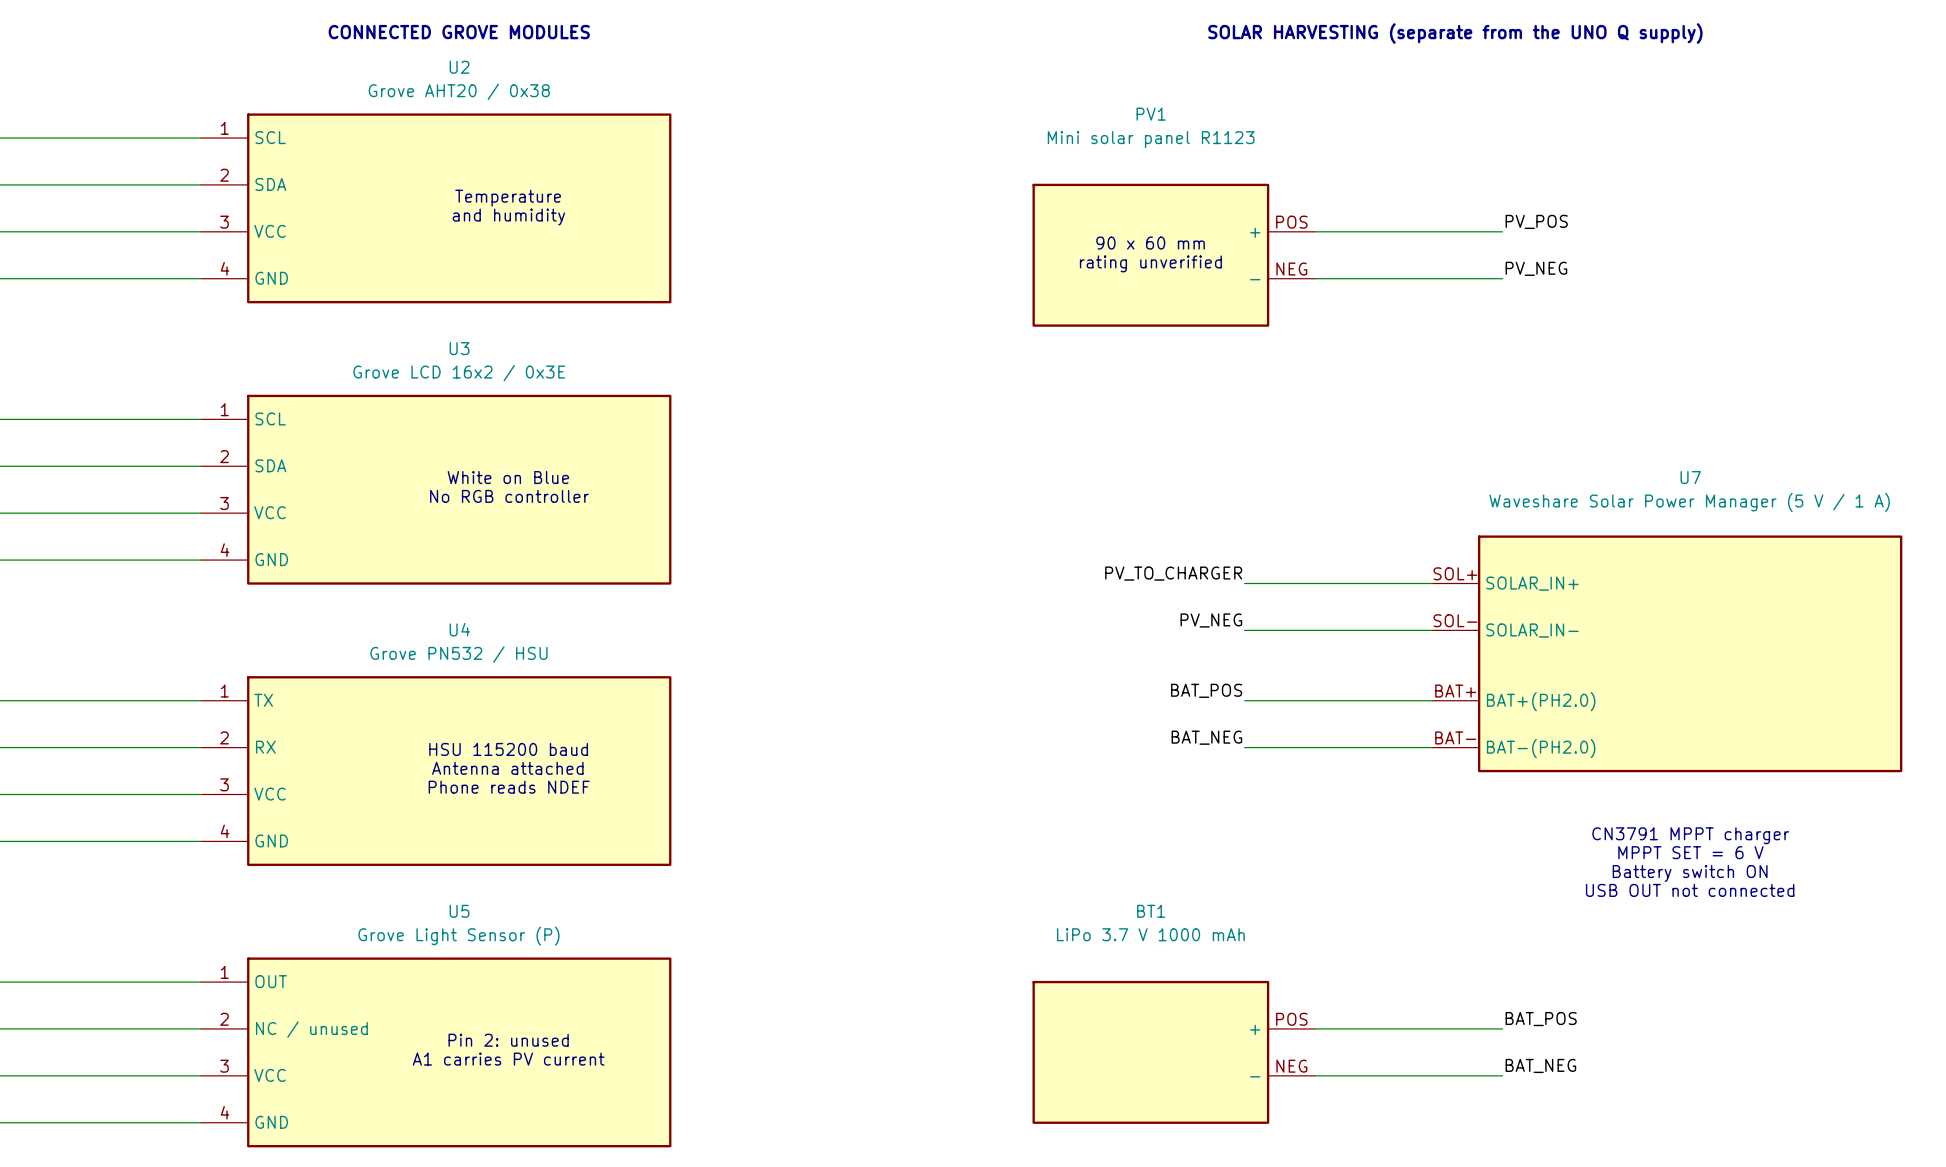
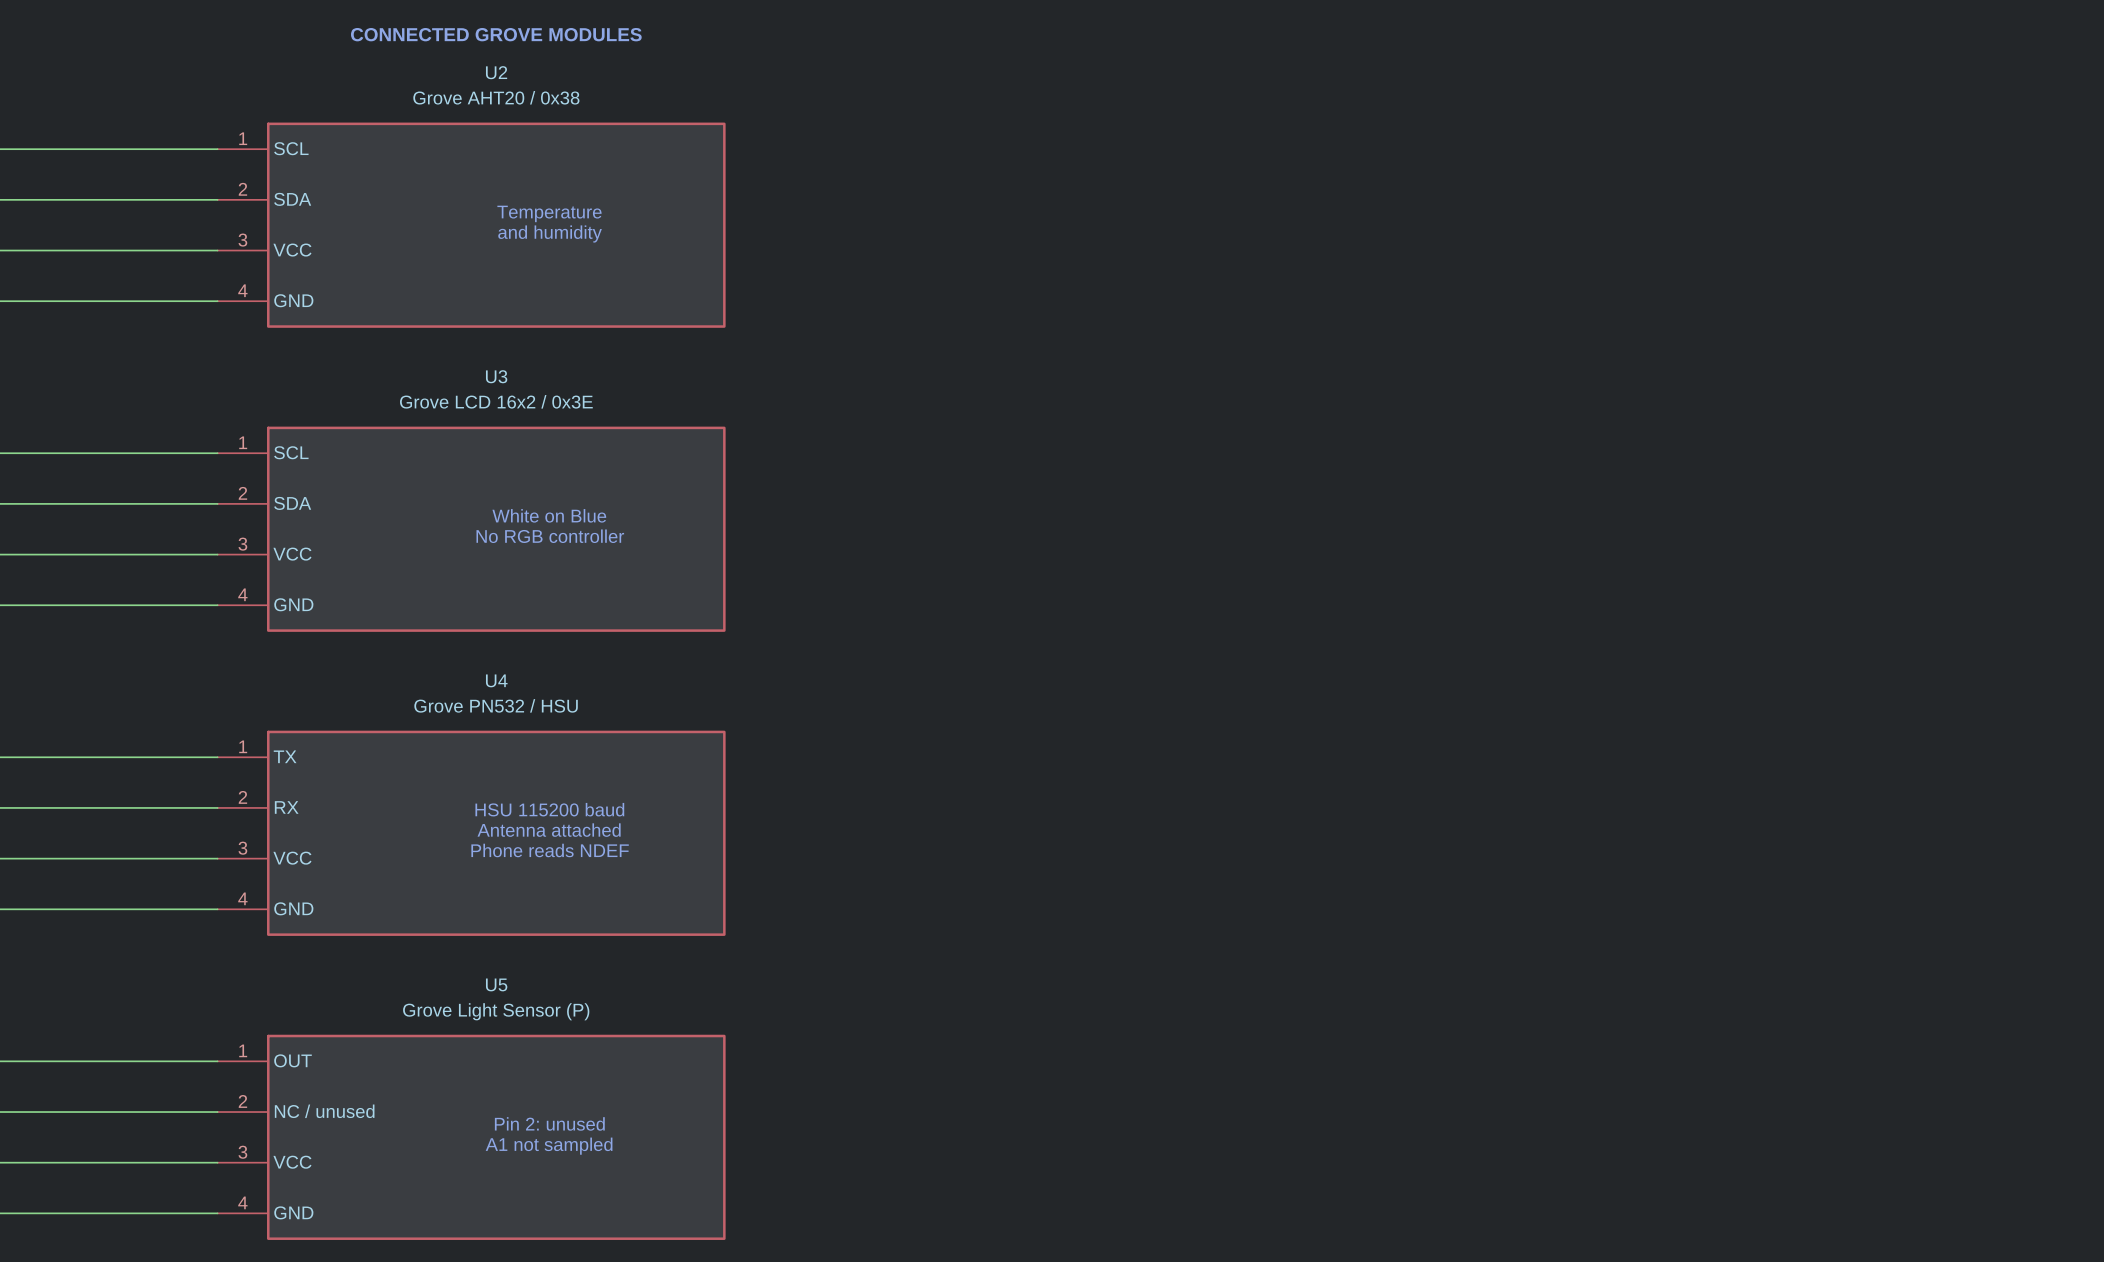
text: SOLAR HARVESTING (separate from the UNO Q supply) (1455, 33) -> none
label: PV_POS (1536, 221) -> none
wire: (1315, 231) (1502, 231) -> none
text: 90 x 60 mm (1150, 243) -> none
PV1: Mini solar panel R1123 (1173, 255) -> none
text: rating unverified (1150, 263) -> none
label: PV_NEG (1536, 268) -> none
wire: (1315, 278) (1502, 278) -> none
label: PV_TO_CHARGER (1173, 573) -> none
wire: (1244, 583) (1432, 583) -> none
label: PV_NEG (1211, 620) -> none
wire: (1244, 630) (1432, 630) -> none
U7: Waveshare Solar Power Manager (5 V / 1 A) (1667, 653) -> none
label: BAT_POS (1206, 690) -> none
wire: (1244, 700) (1432, 700) -> none
label: BAT_NEG (1206, 737) -> none
wire: (1244, 747) (1432, 747) -> none
text: CN3791 MPPT charger (1690, 835) -> none
text: MPPT SET = 6 V (1690, 852) -> none
text: Battery switch ON (1690, 873) -> none
text: USB OUT not connected (1690, 890) -> none
label: BAT_POS (1541, 1019) -> none
wire: (1315, 1028) (1502, 1028) -> none
BT1: LiPo 3.7 V 1000 mAh (1173, 1052) -> none
text: A1 carries PV current (508, 1059) -> A1 not sampled (549, 1146)
label: BAT_NEG (1540, 1065) -> none
wire: (1315, 1075) (1502, 1075) -> none

